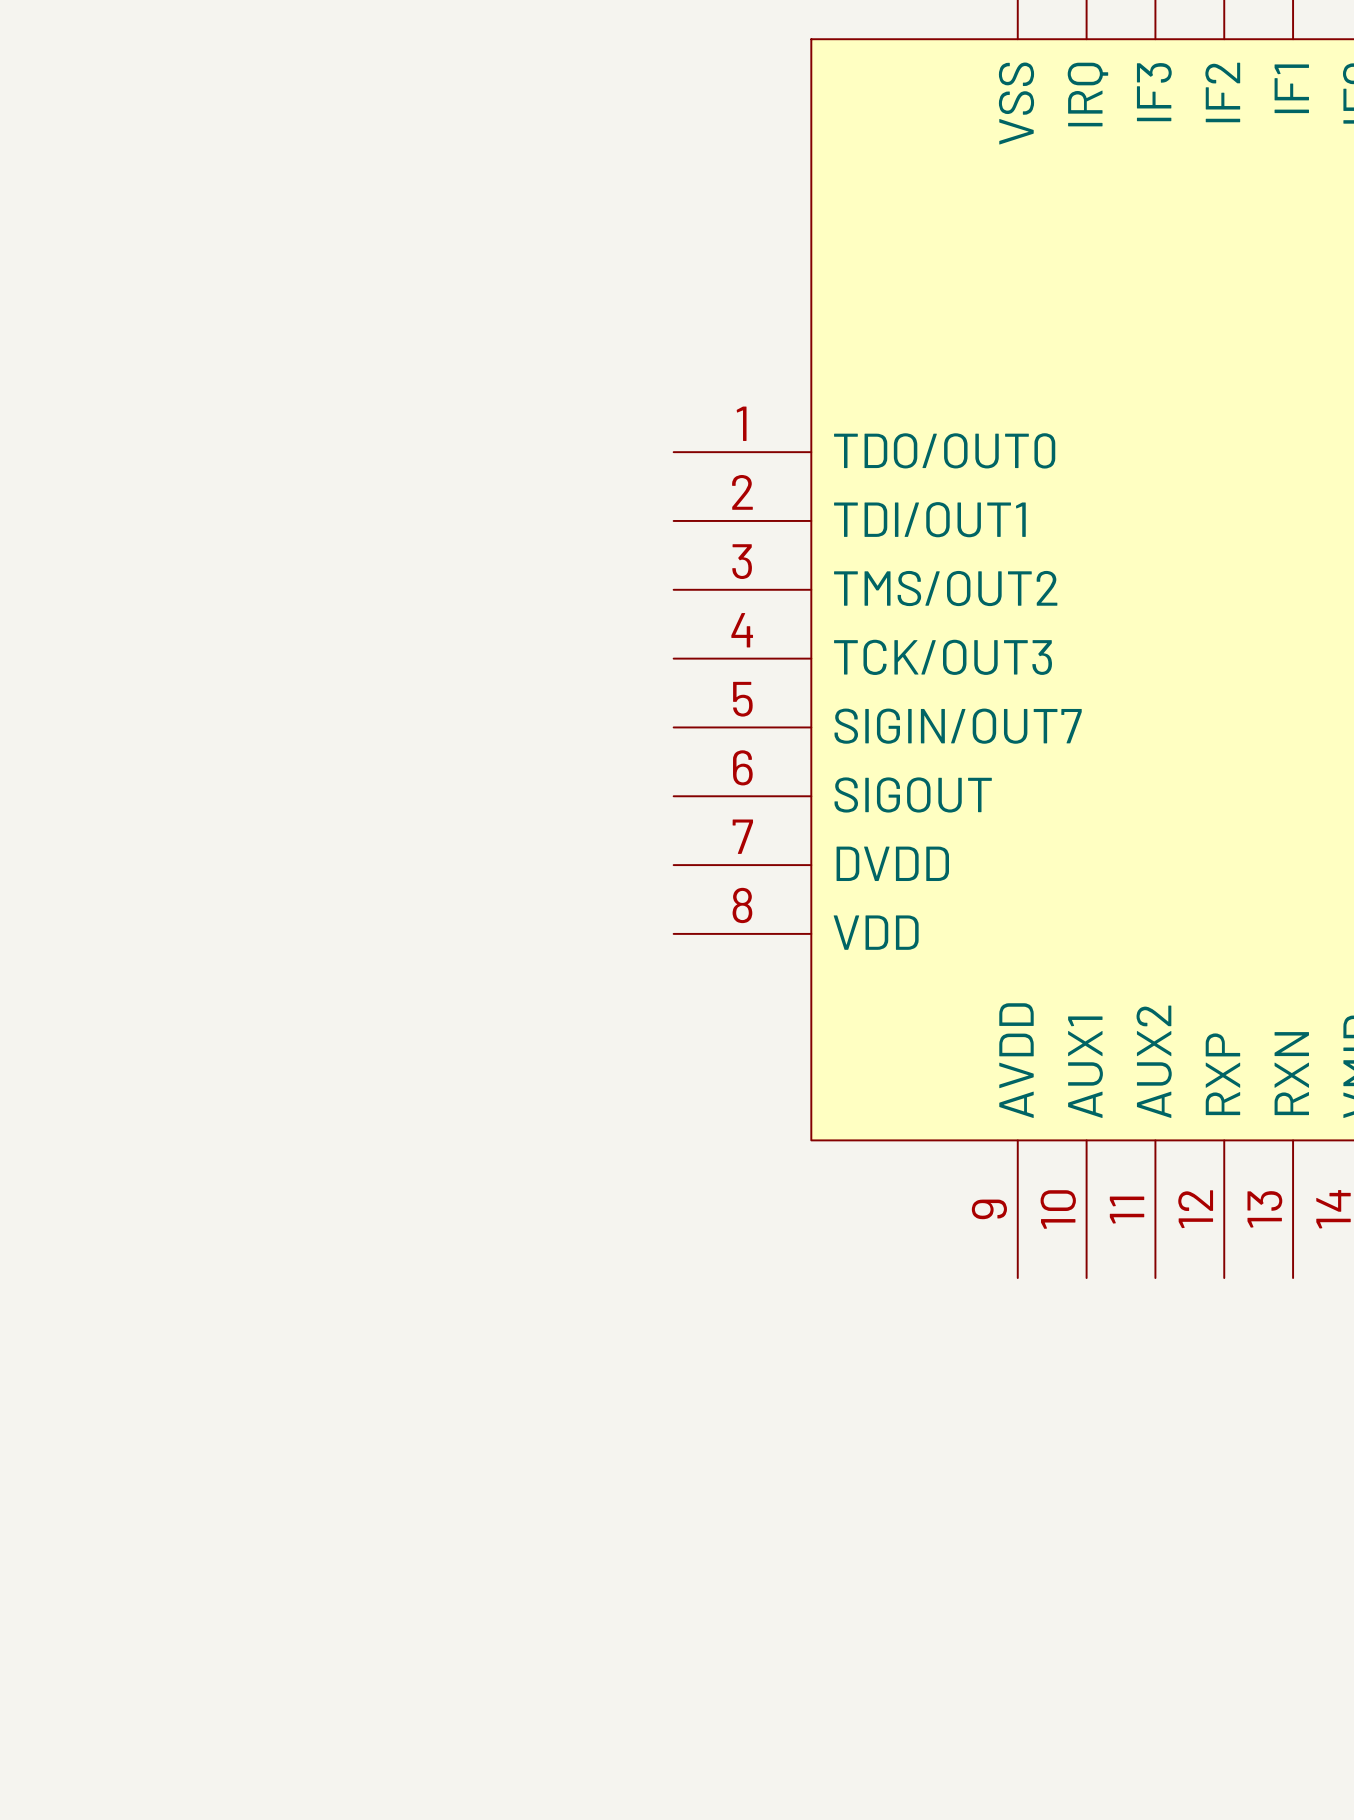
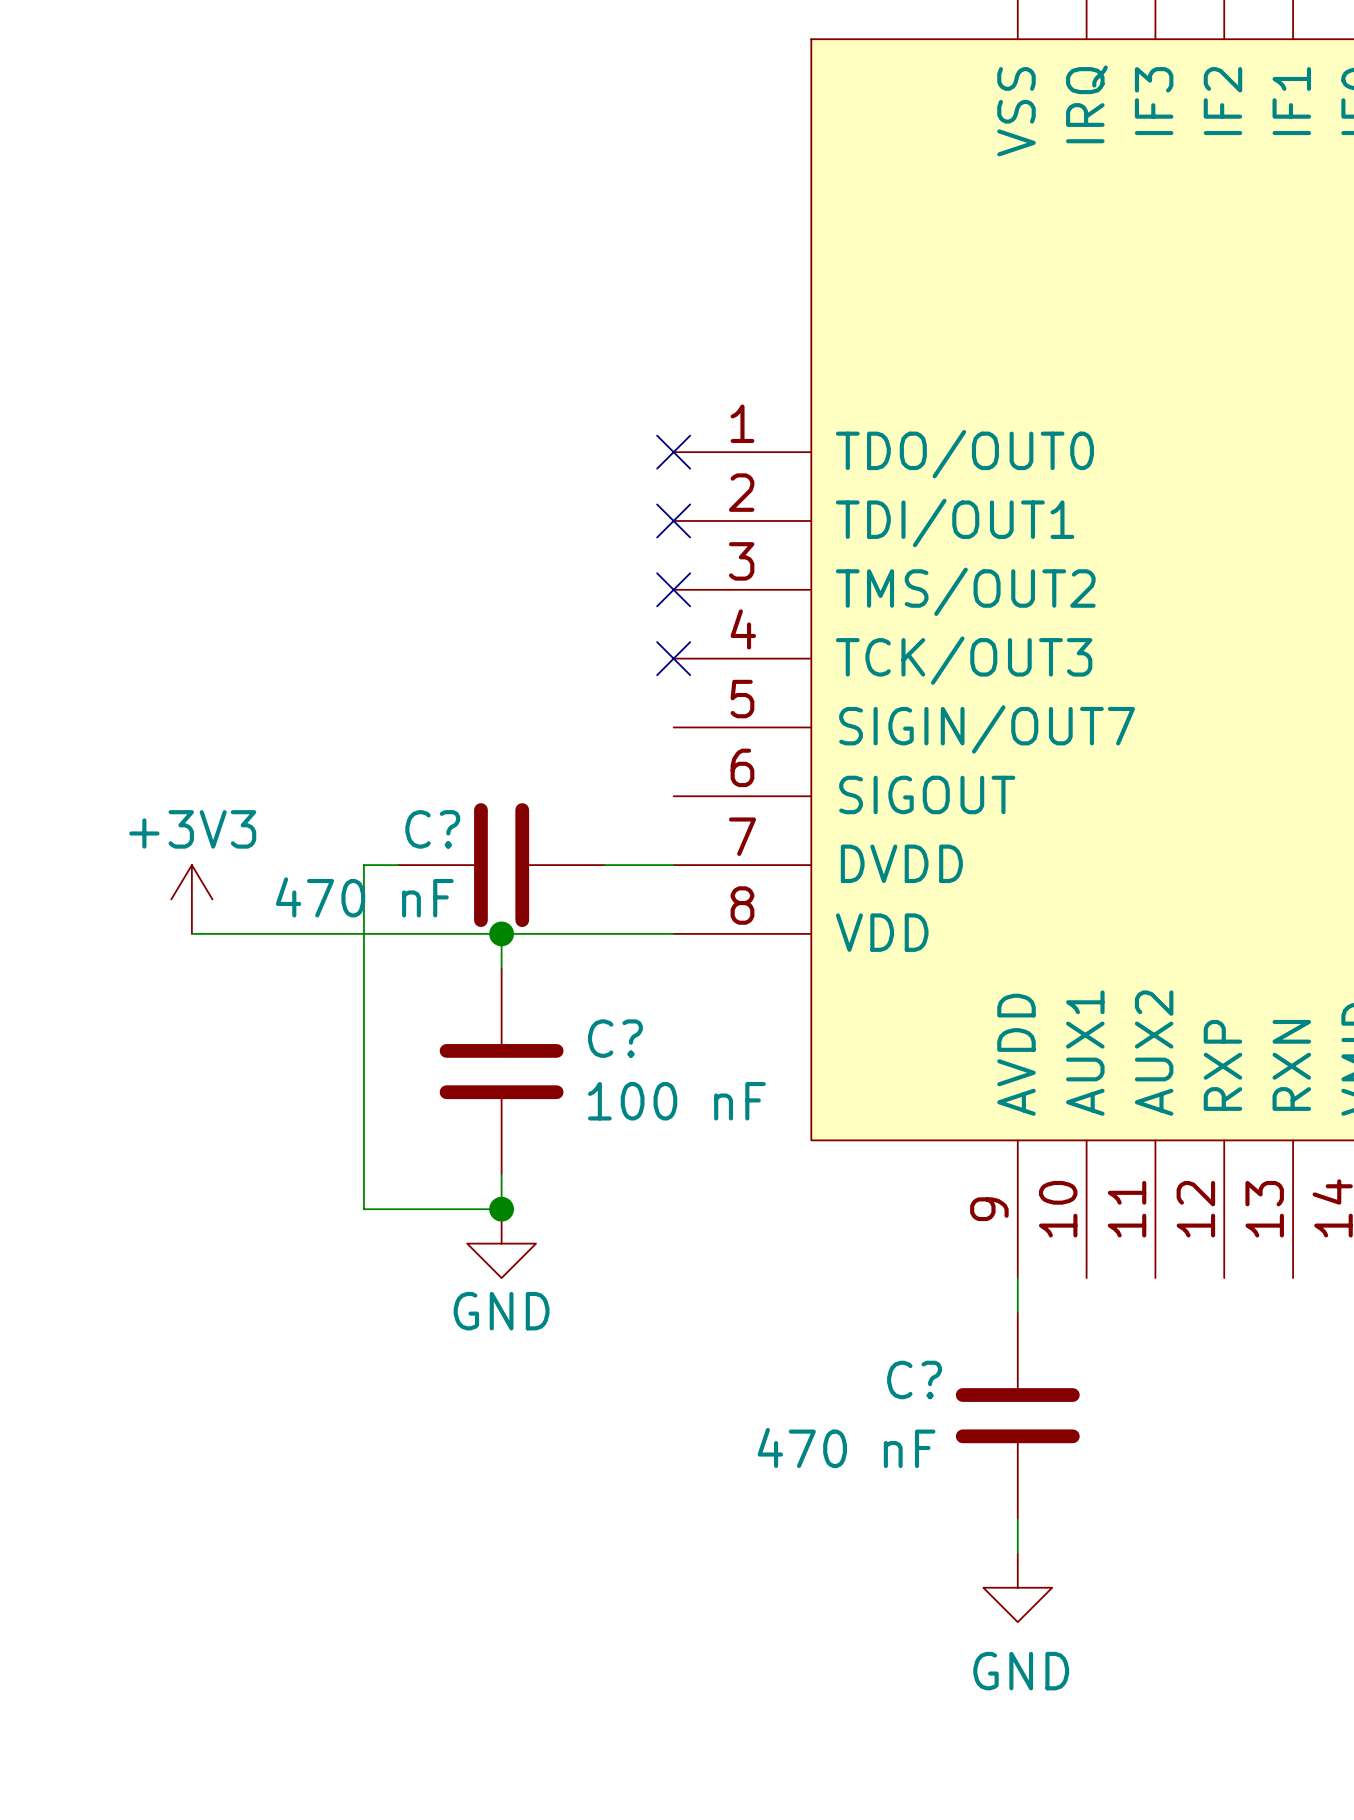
no-connect mark: none -> (673, 452)
no-connect mark: none -> (673, 520)
no-connect mark: none -> (673, 589)
no-connect mark: none -> (673, 658)
wire: none -> (398, 865) (363, 865) (363, 1209) (501, 1209) (501, 1174)
C?: none -> 470 nF (501, 865)
wire: none -> (604, 865) (673, 865)
power symbol: none -> +3V3 (191, 899)
wire: none -> (191, 933) (673, 933)
wire: none -> (501, 933) (501, 968)
junction: none -> (501, 933)
C?: none -> 100 nF (501, 1071)
junction: none -> (501, 1209)
power symbol: none -> GND (501, 1243)
wire: none -> (1017, 1278) (1017, 1312)
C?: none -> 470 nF (1017, 1415)
wire: none -> (1017, 1518) (1017, 1553)
power symbol: none -> GND (1017, 1587)

